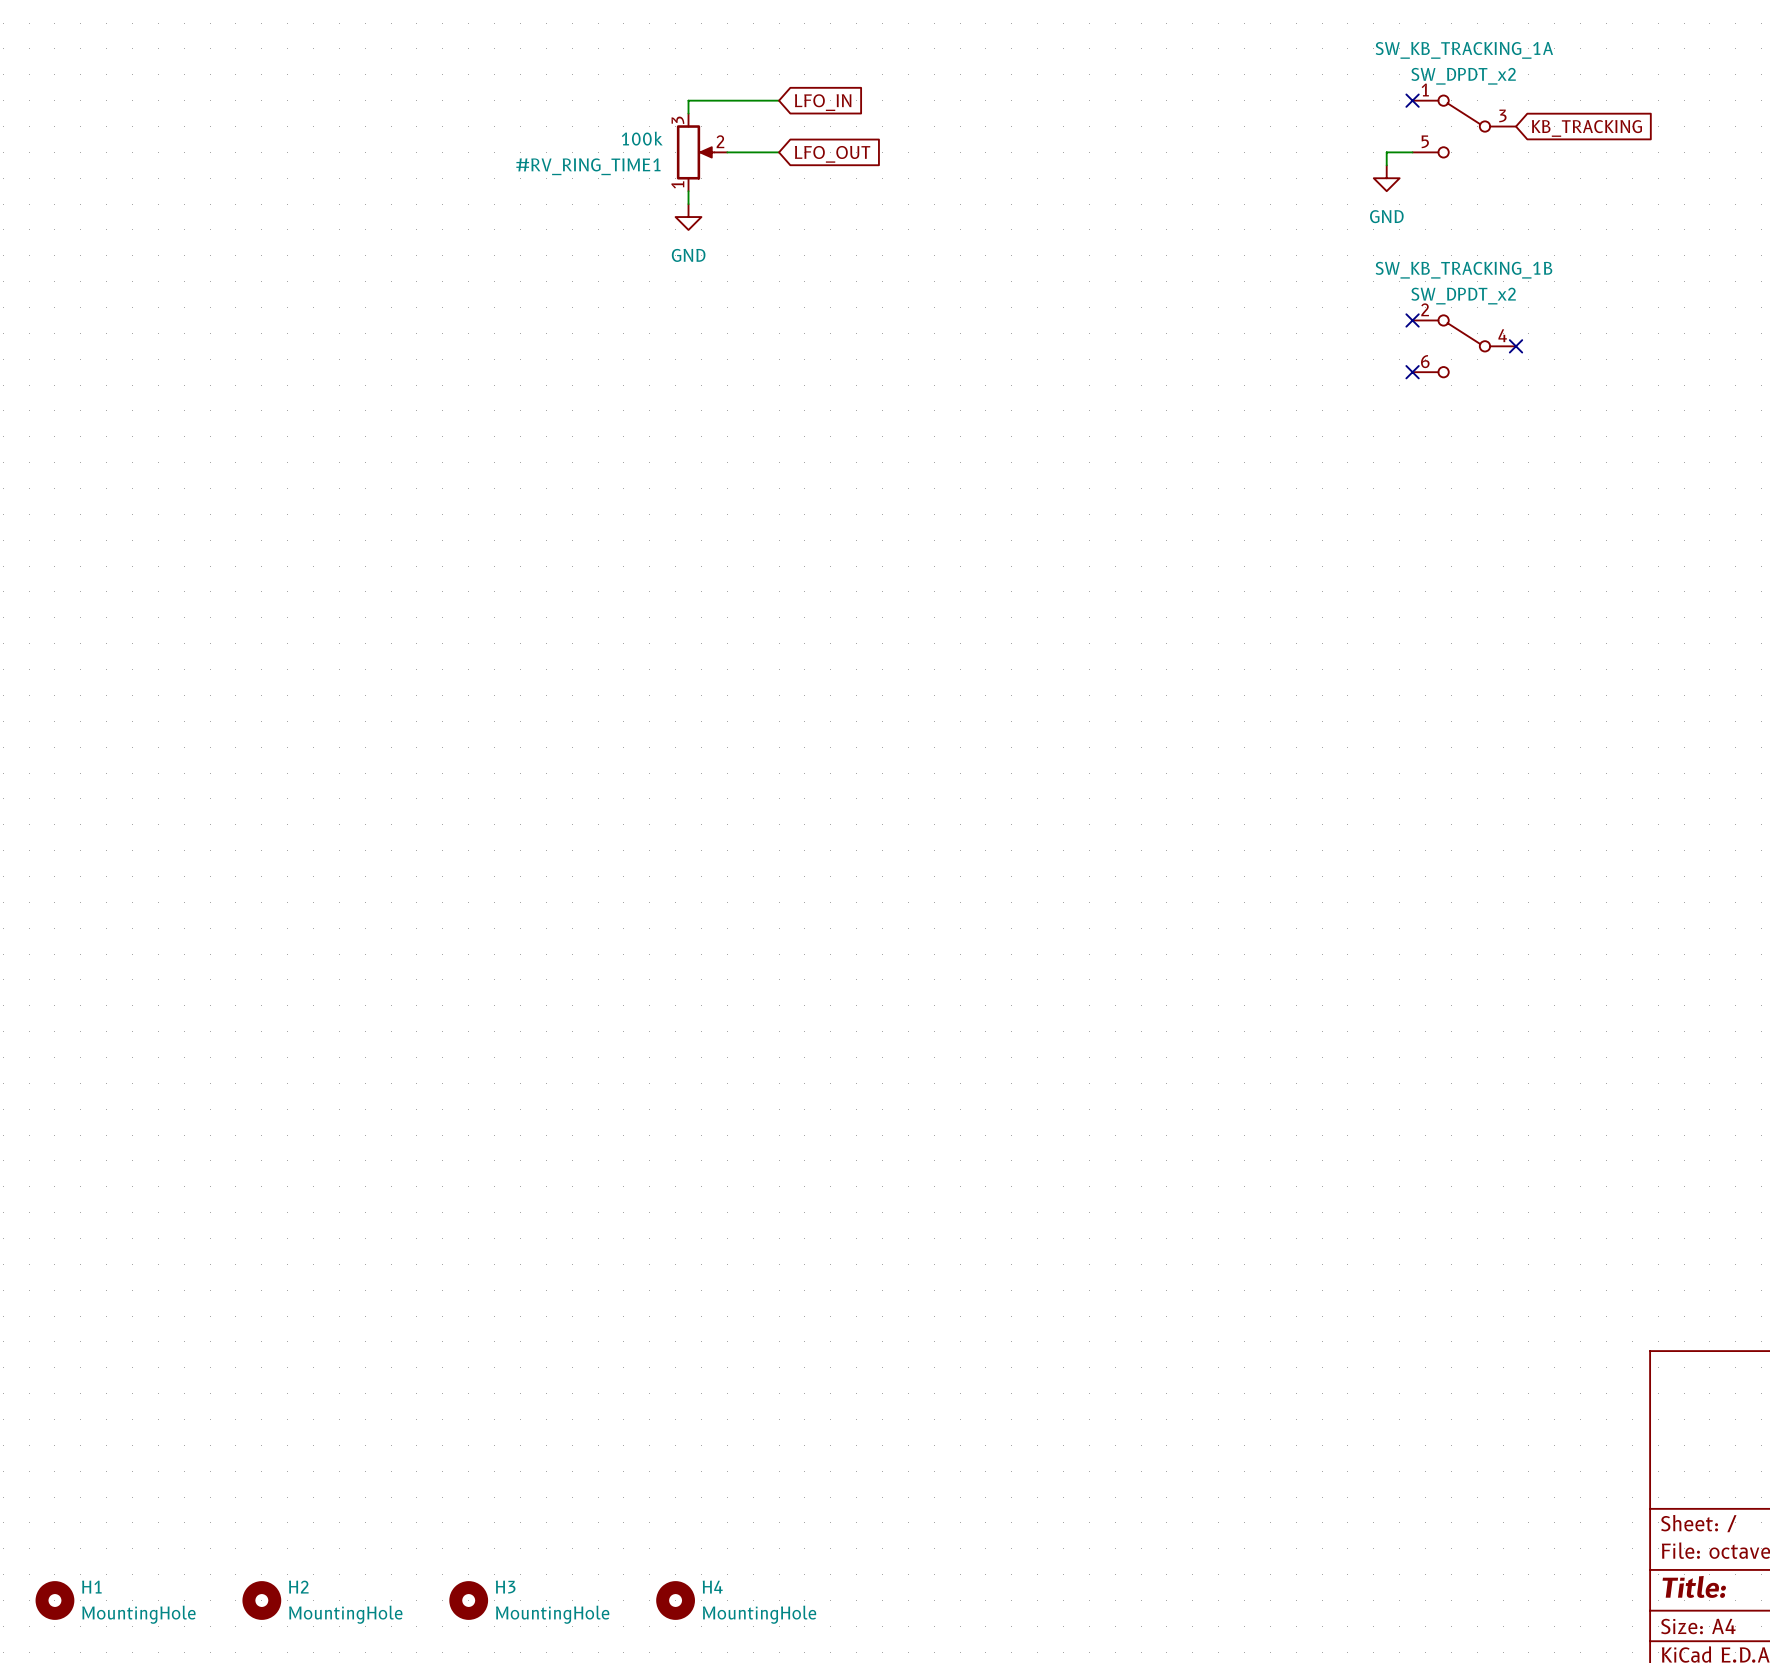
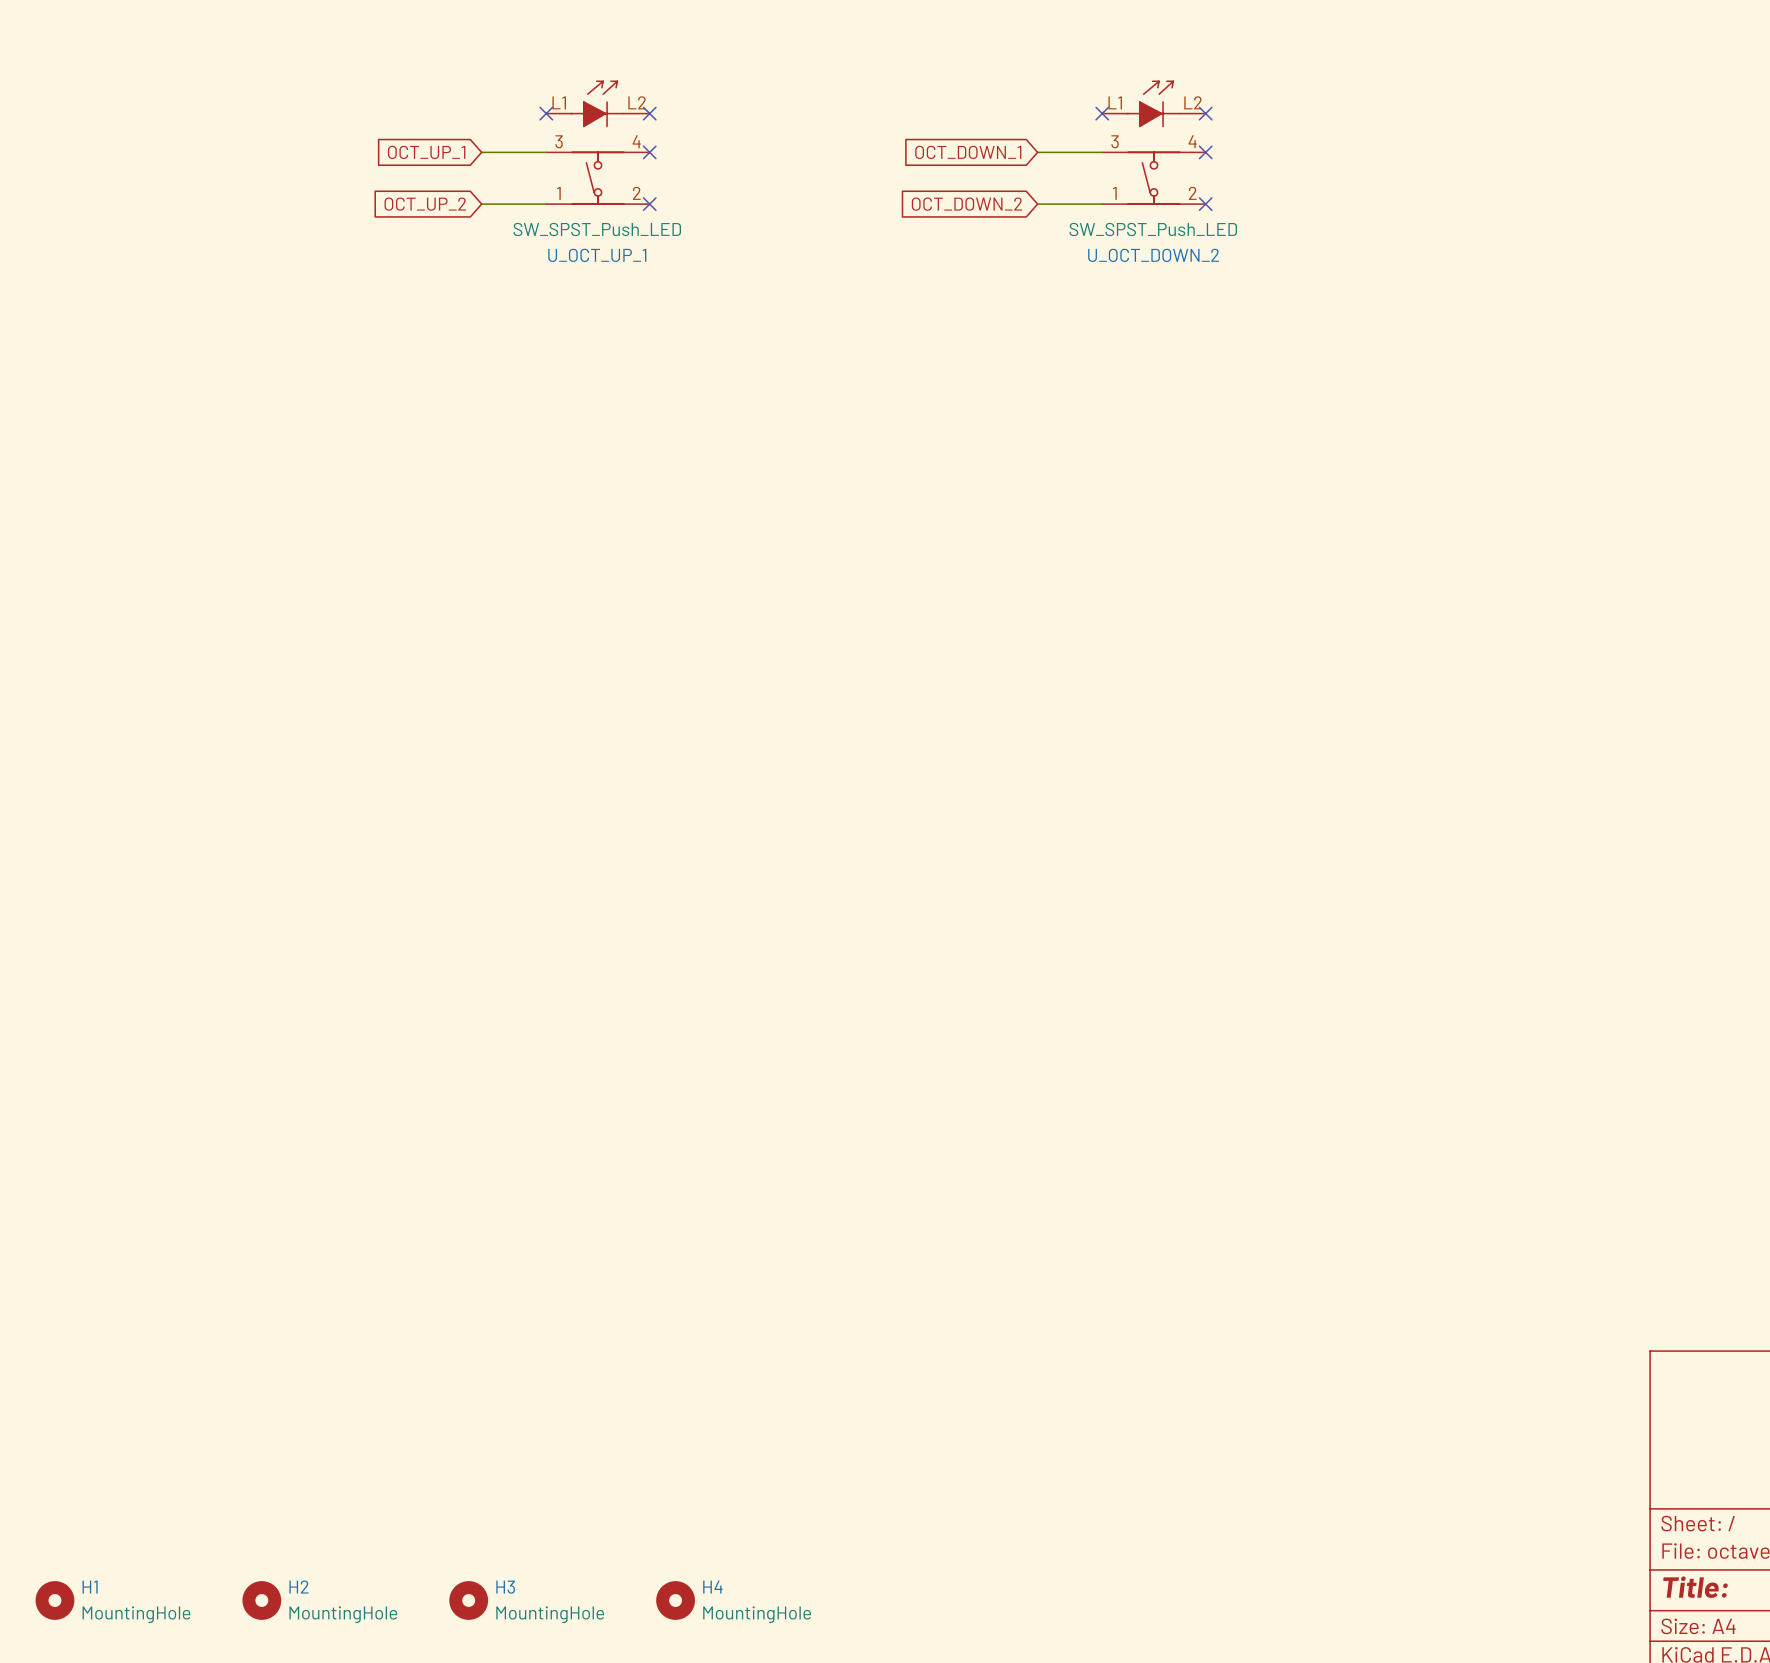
wire: (779, 100) (688, 100) (688, 113) -> none
no-connect mark: (1412, 100) -> none
global label: LFO_IN (823, 102) -> none
no-connect mark: none -> (546, 113)
no-connect mark: none -> (649, 113)
no-connect mark: none -> (1102, 113)
no-connect mark: none -> (1205, 113)
SW_KB_TRACKING_1A: SW_DPDT_x2 (1464, 126) -> none
global label: KB_TRACKING (1586, 128) -> none
U_OCT_UP_1: none -> SW_SPST_Push_LED (598, 142)
U_OCT_DOWN_2: none -> SW_SPST_Push_LED (1153, 142)
wire: none -> (481, 152) (546, 152)
no-connect mark: none -> (649, 152)
#RV_RING_TIME1: 100k (702, 152) -> none
wire: (727, 152) (779, 152) -> none
wire: none -> (1037, 152) (1102, 152)
no-connect mark: none -> (1205, 152)
wire: (1412, 152) (1386, 152) (1386, 165) -> none
global label: none -> OCT_UP_1 (426, 152)
global label: LFO_OUT (832, 154) -> none
global label: none -> OCT_DOWN_1 (968, 152)
power symbol: GND (1386, 178) -> none
wire: (688, 191) (688, 204) -> none
wire: none -> (481, 204) (546, 204)
no-connect mark: none -> (649, 204)
wire: none -> (1037, 204) (1102, 204)
no-connect mark: none -> (1205, 204)
global label: none -> OCT_UP_2 (425, 204)
global label: none -> OCT_DOWN_2 (966, 204)
power symbol: GND (688, 217) -> none
no-connect mark: (1412, 320) -> none
SW_KB_TRACKING_1B: SW_DPDT_x2 (1464, 346) -> none
no-connect mark: (1516, 346) -> none
no-connect mark: (1412, 372) -> none

